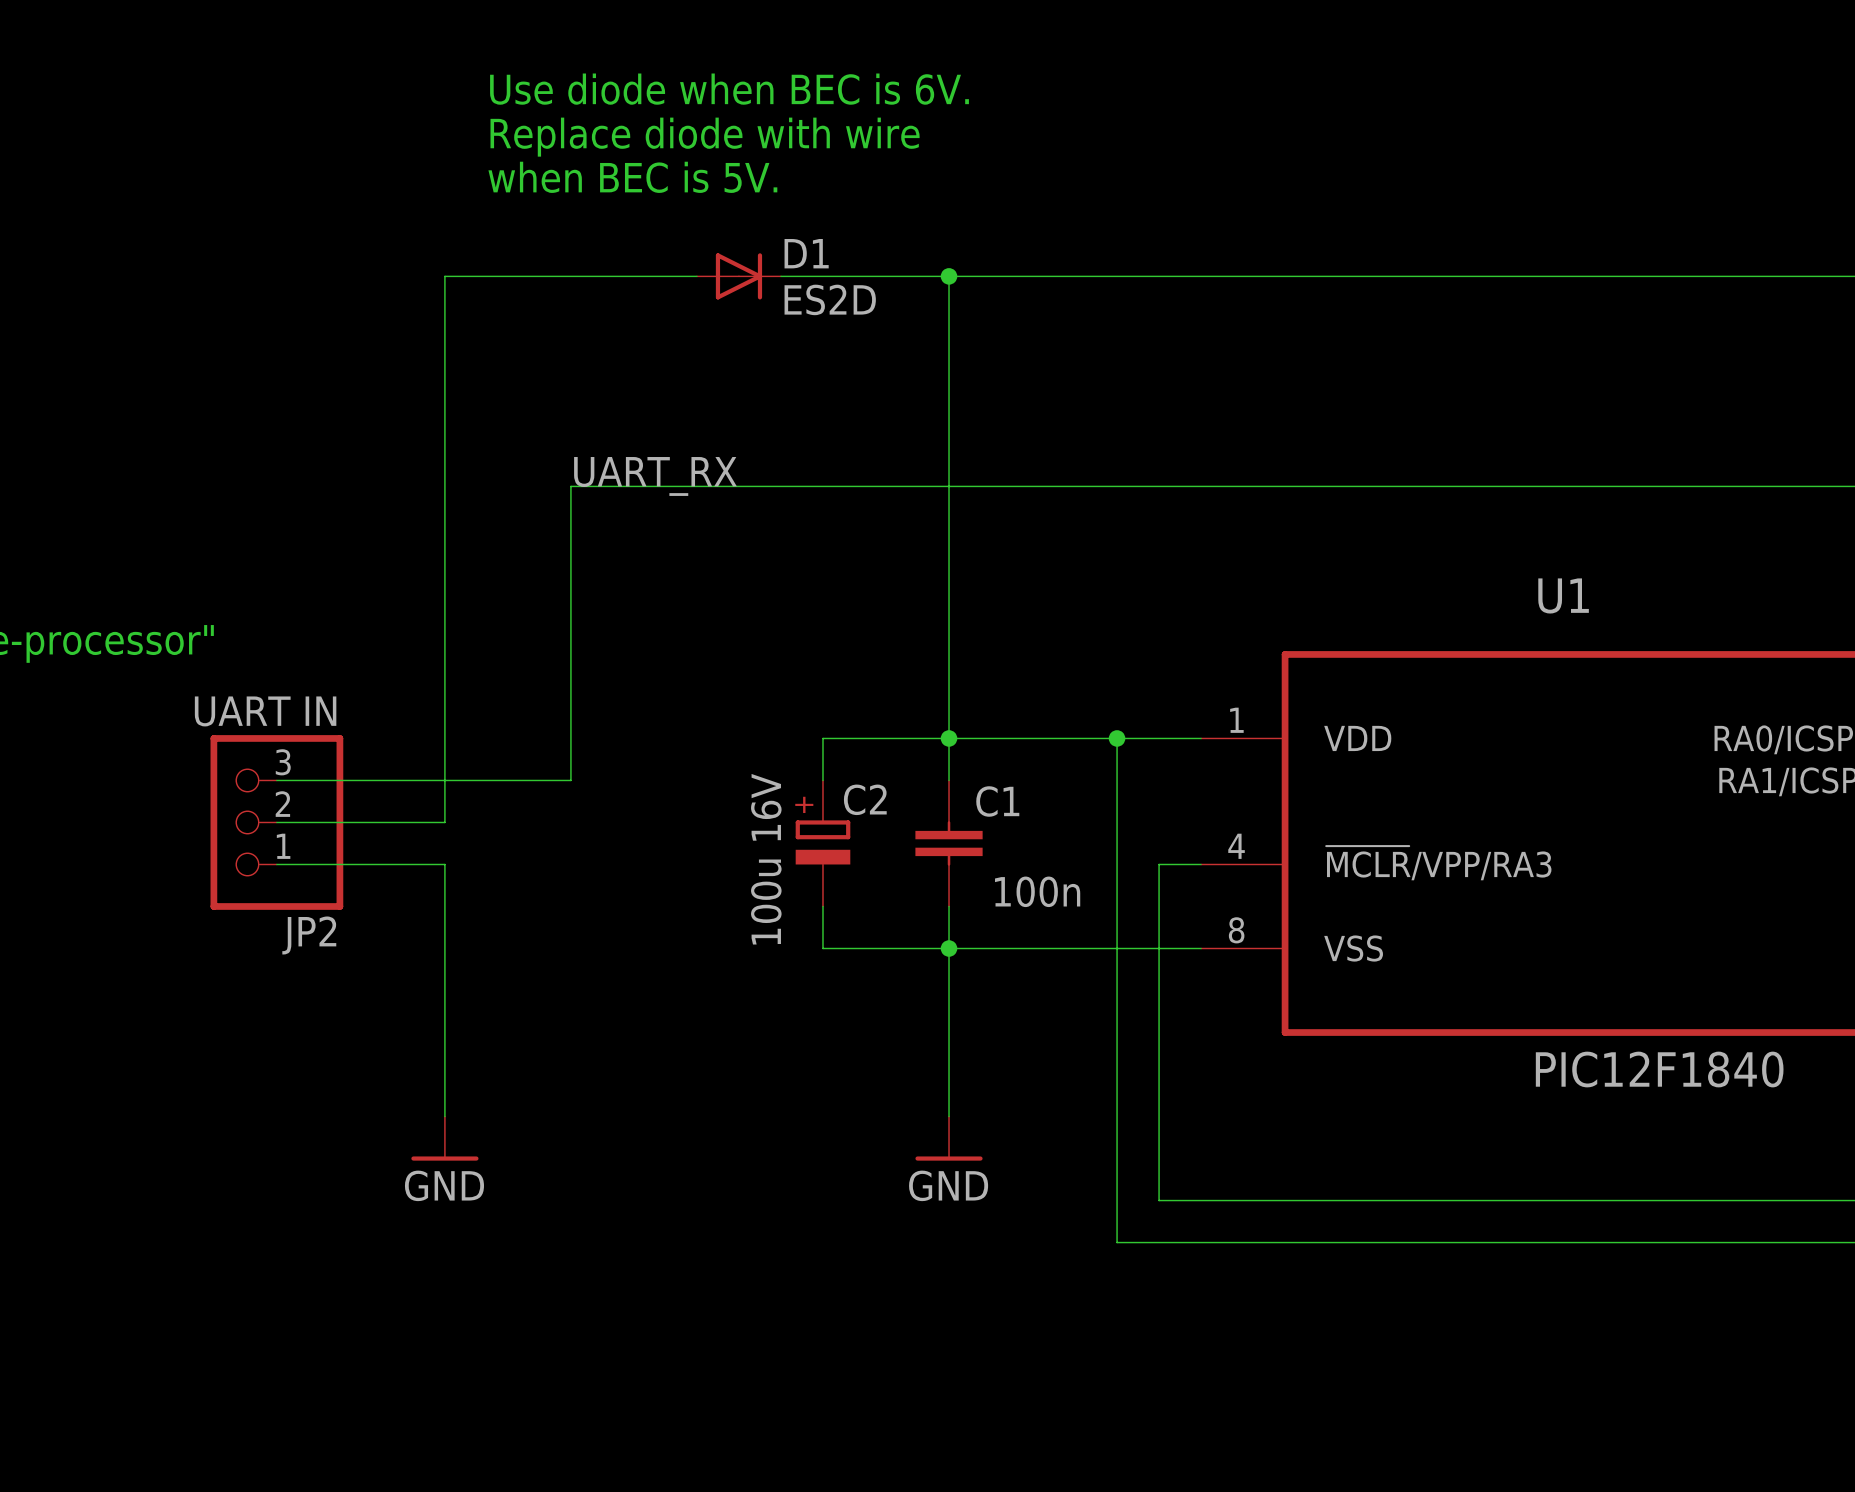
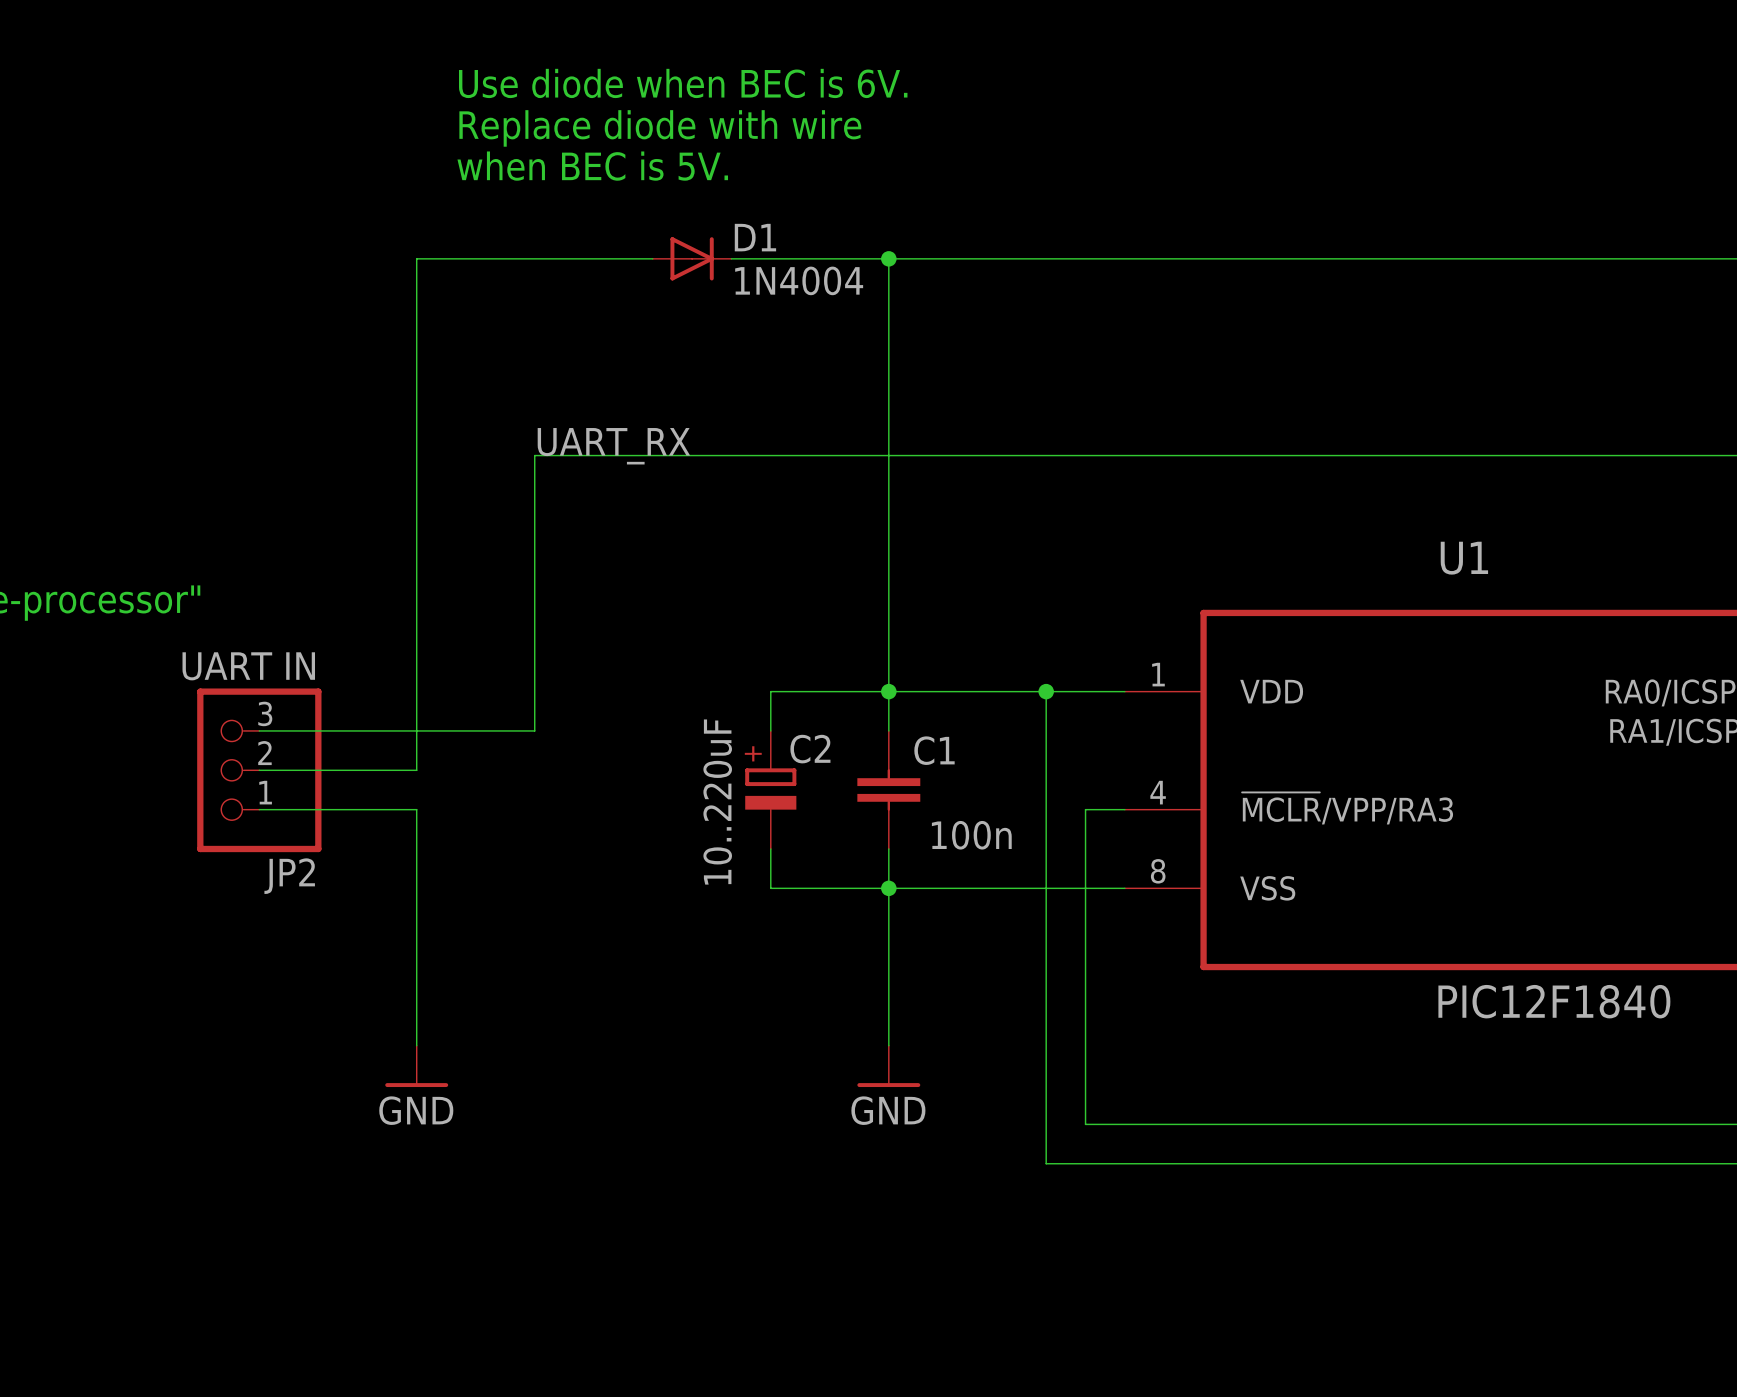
D1 value: ES2D (830, 299) -> 1N4004 (799, 280)
C2 value: 100u 16V (766, 859) -> 10..220uF (717, 802)

